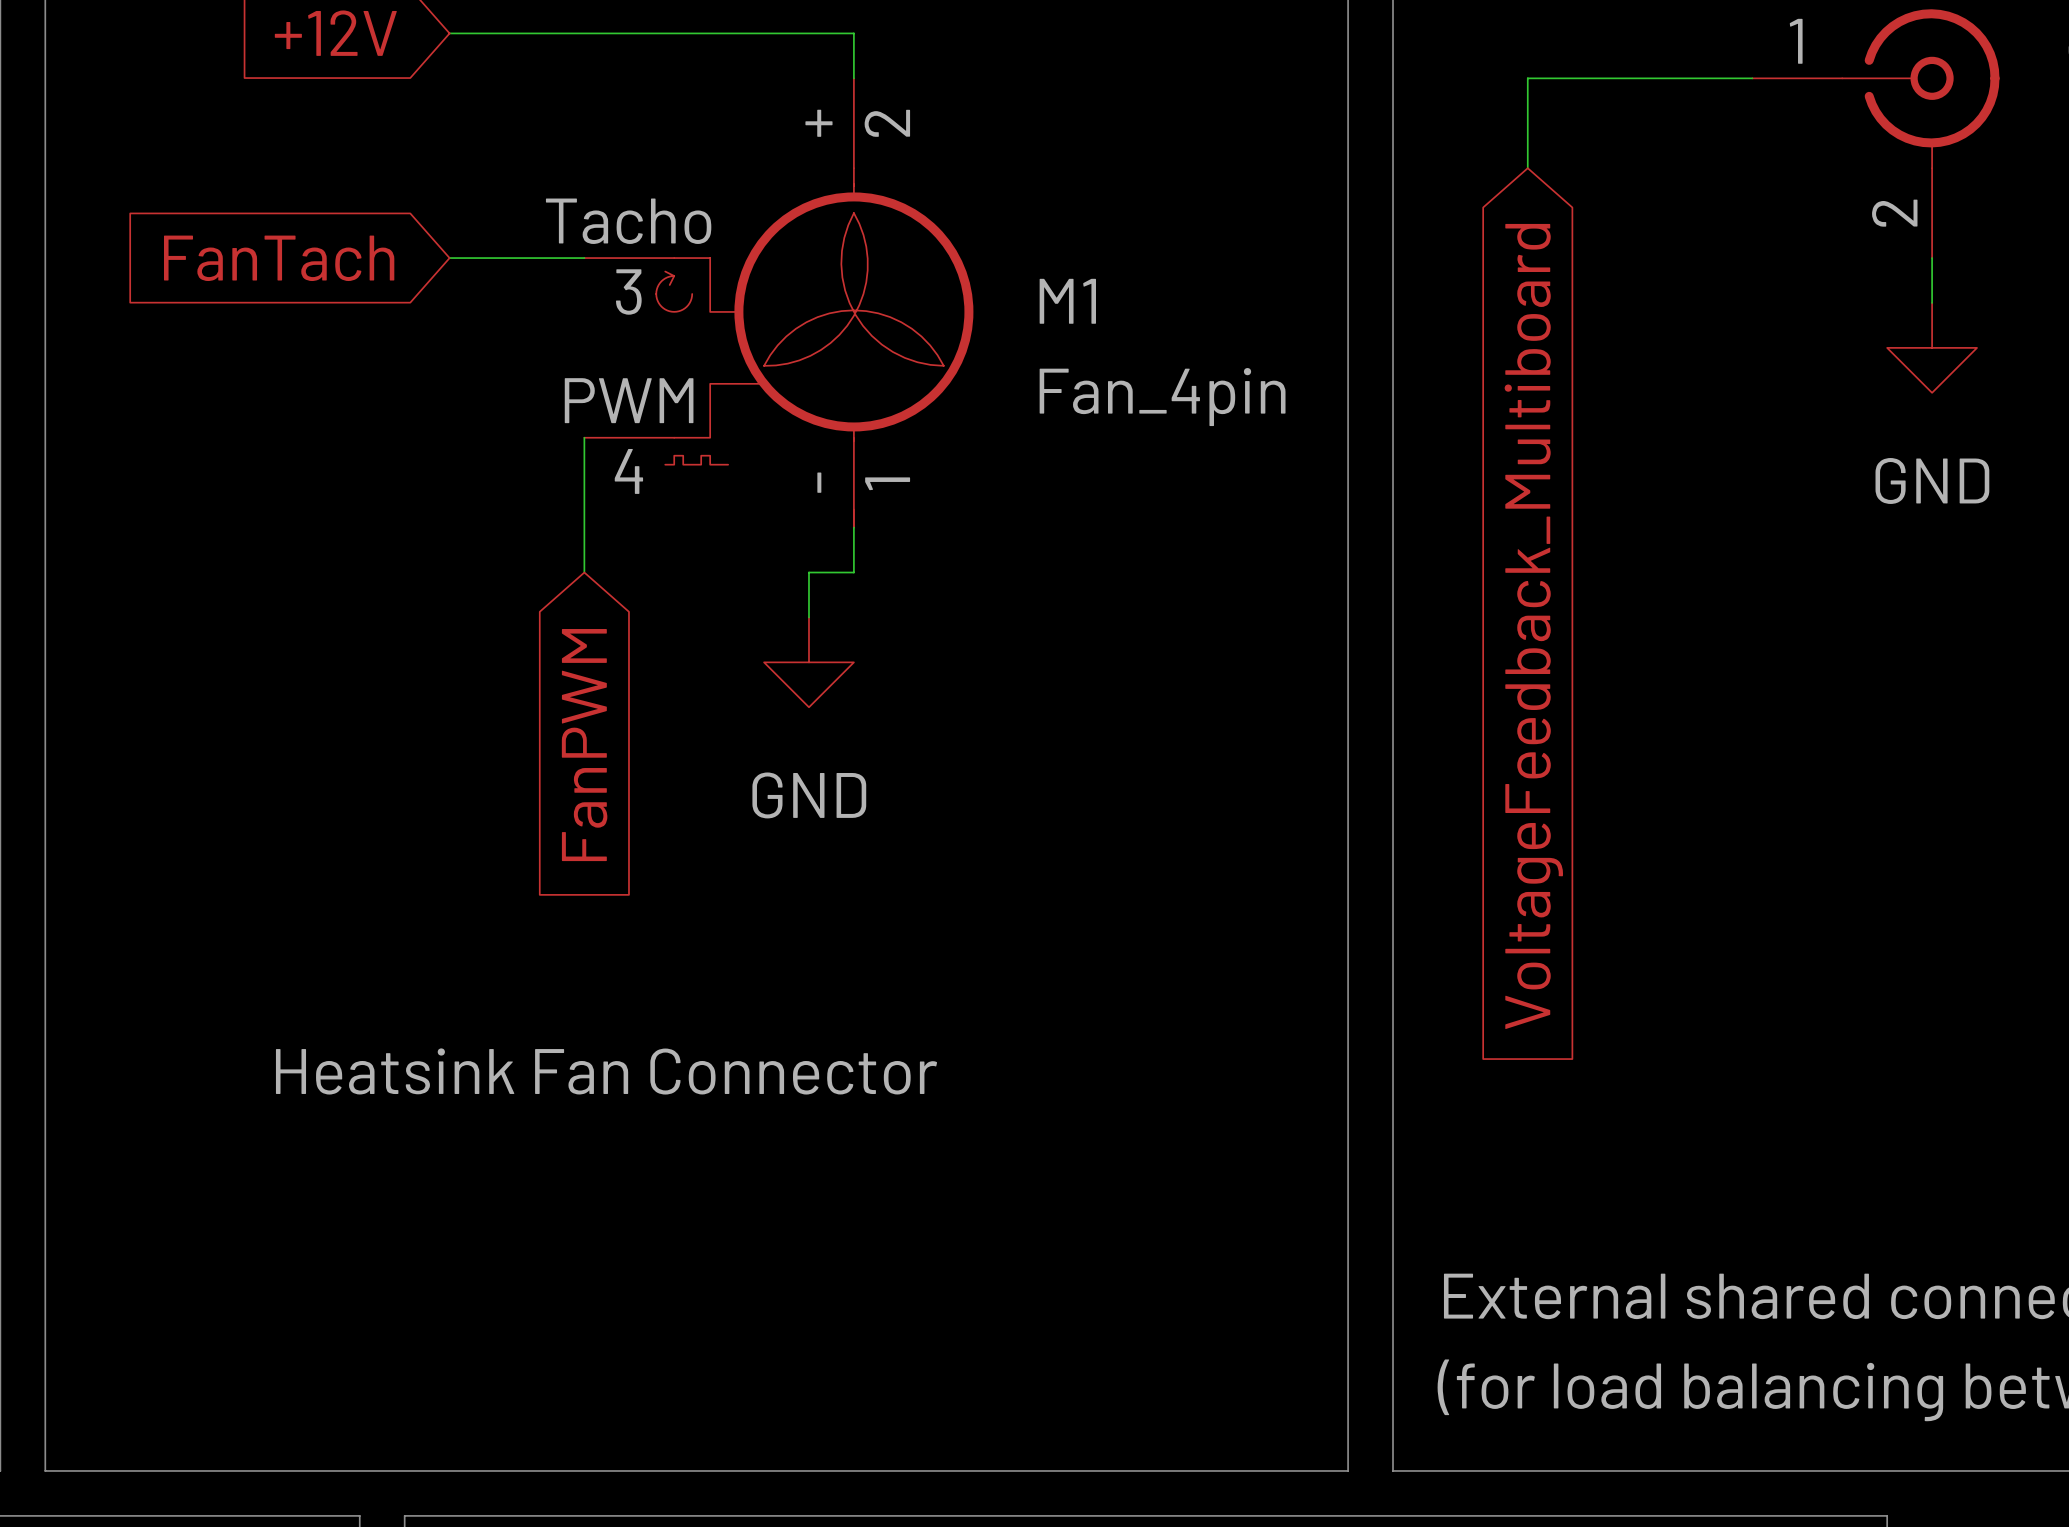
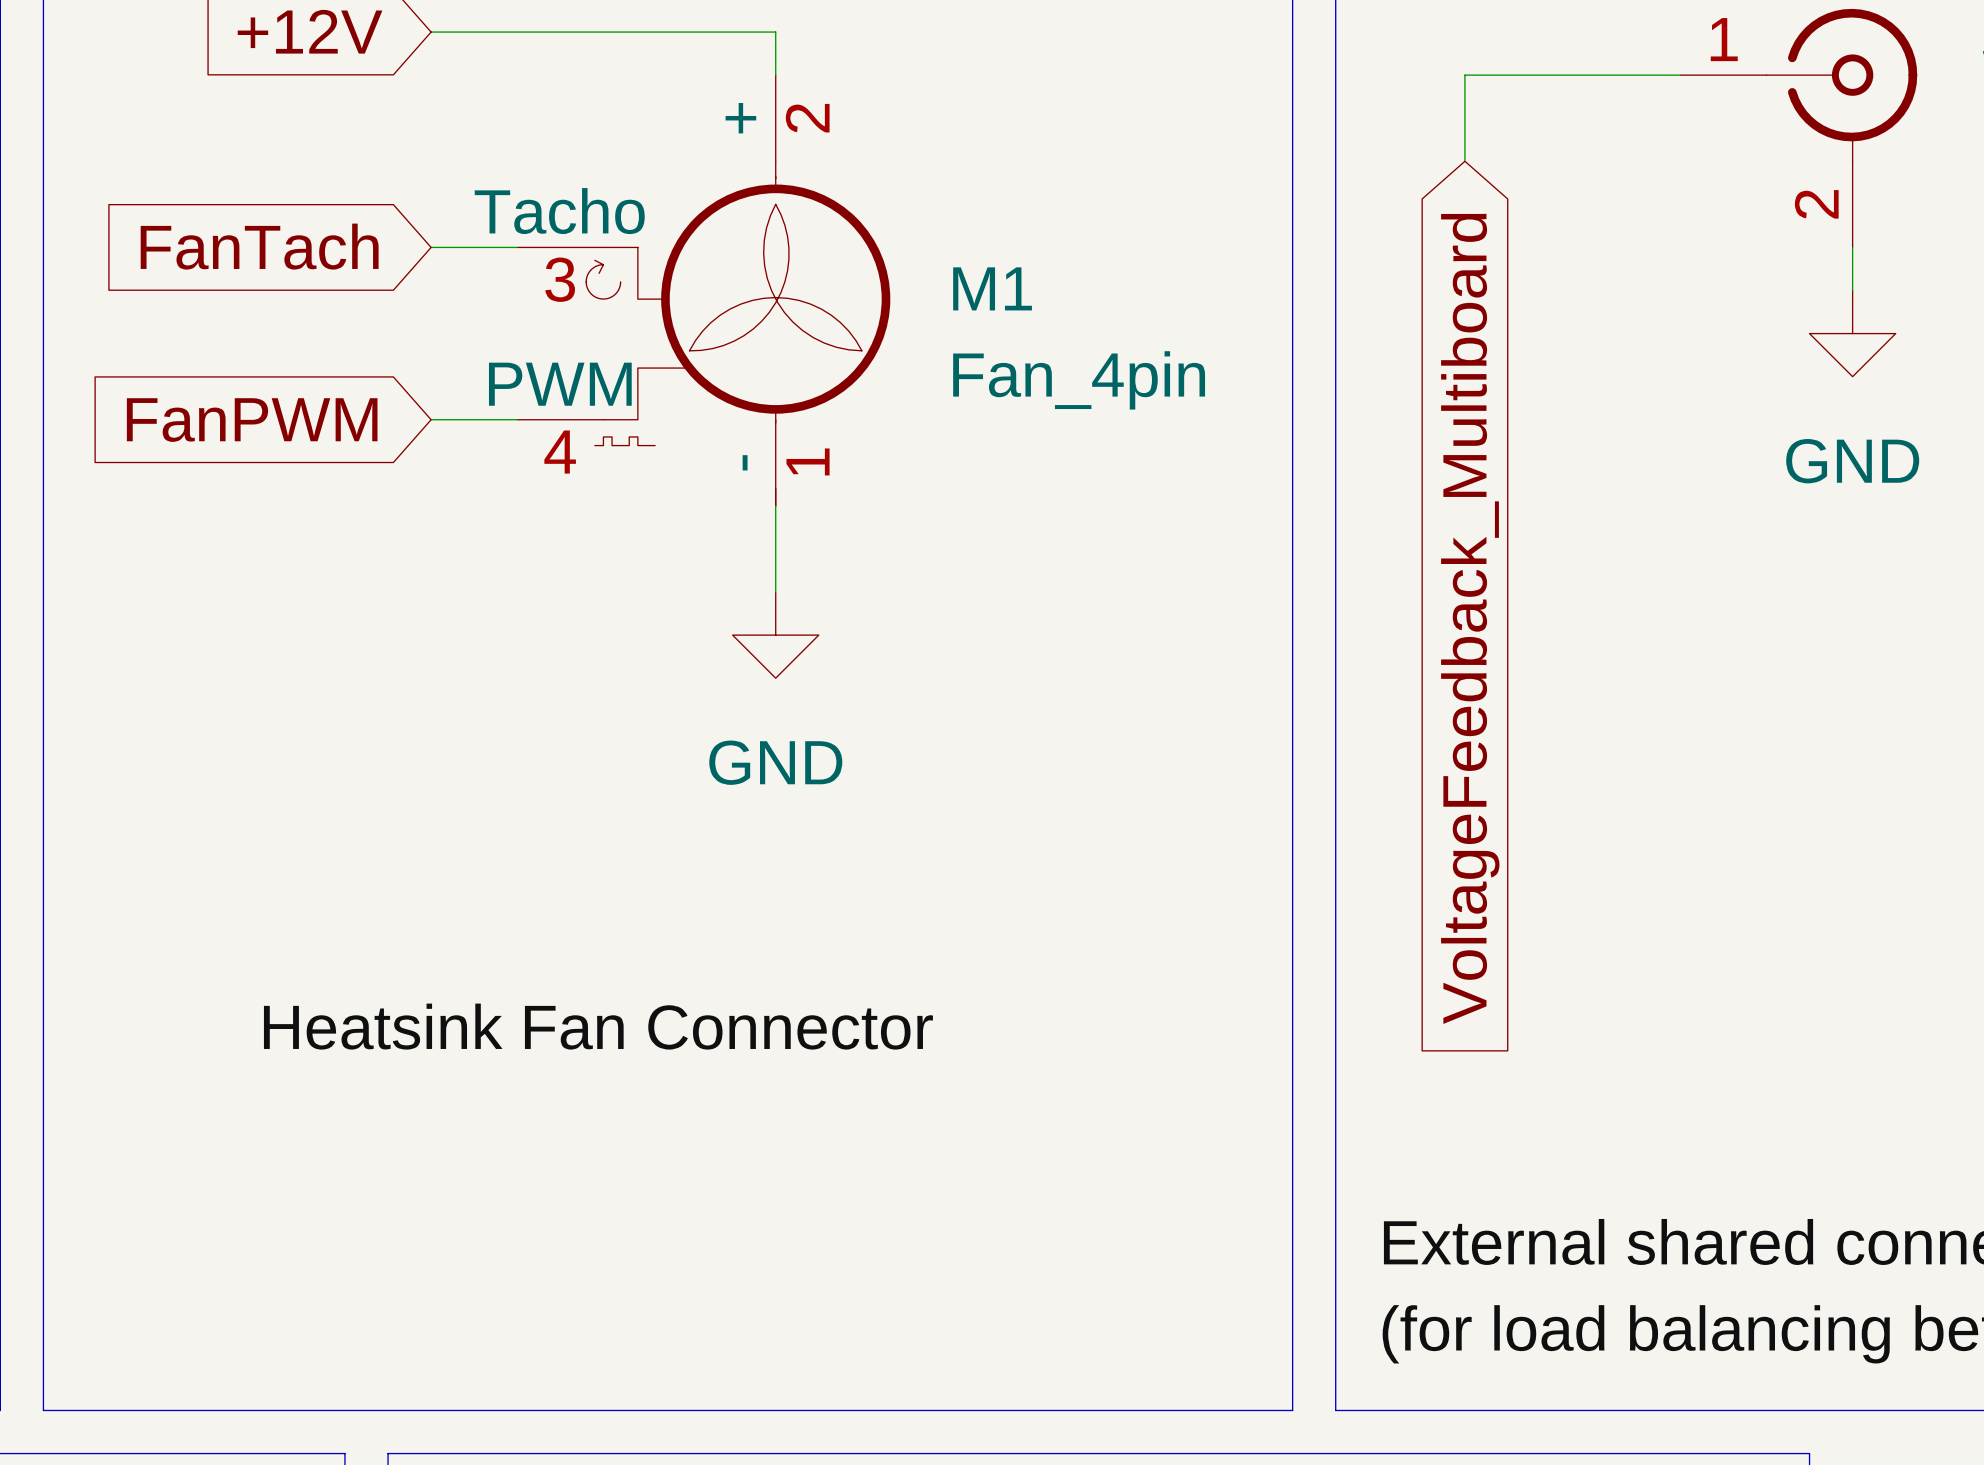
wire: (808, 33) (853, 33) (853, 78) -> (775, 32) (775, 75)
M1 position: (778, 302) -> (703, 290)
wire: none -> (431, 419) (517, 419)
wire: (584, 437) (584, 572) -> none
wire: (853, 527) (853, 572) (808, 572) -> (775, 505) (775, 548)
global label rotation: 0° (584, 745) -> 90° clockwise (252, 420)
global label position: FanPWM (584, 745) -> FanPWM (252, 420)

